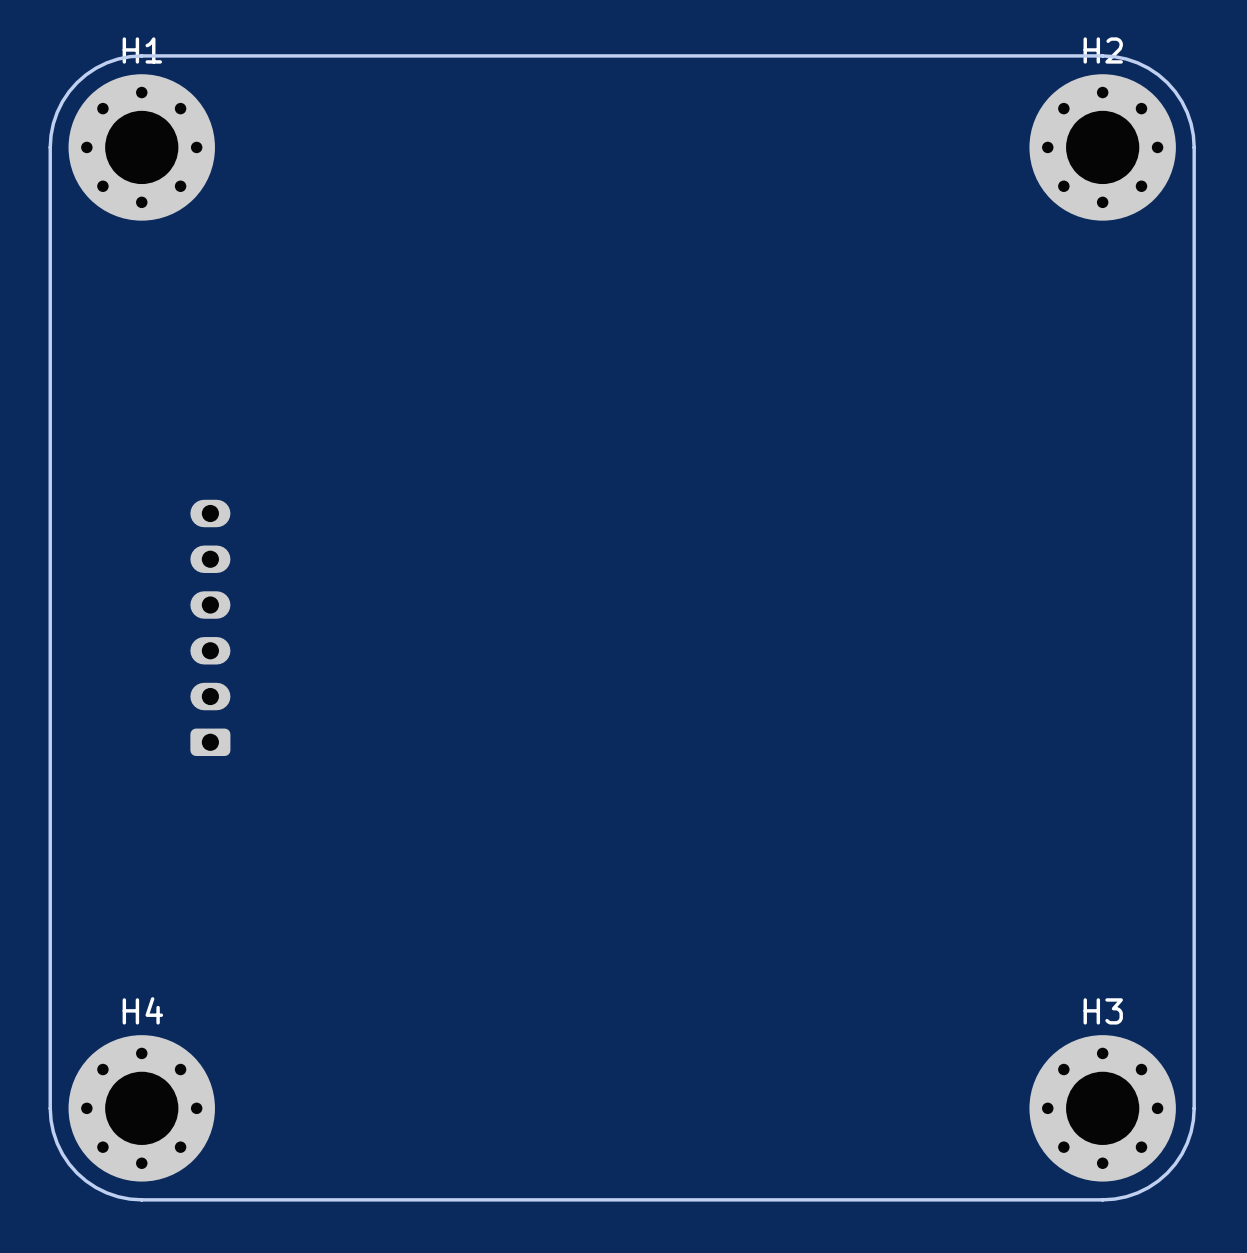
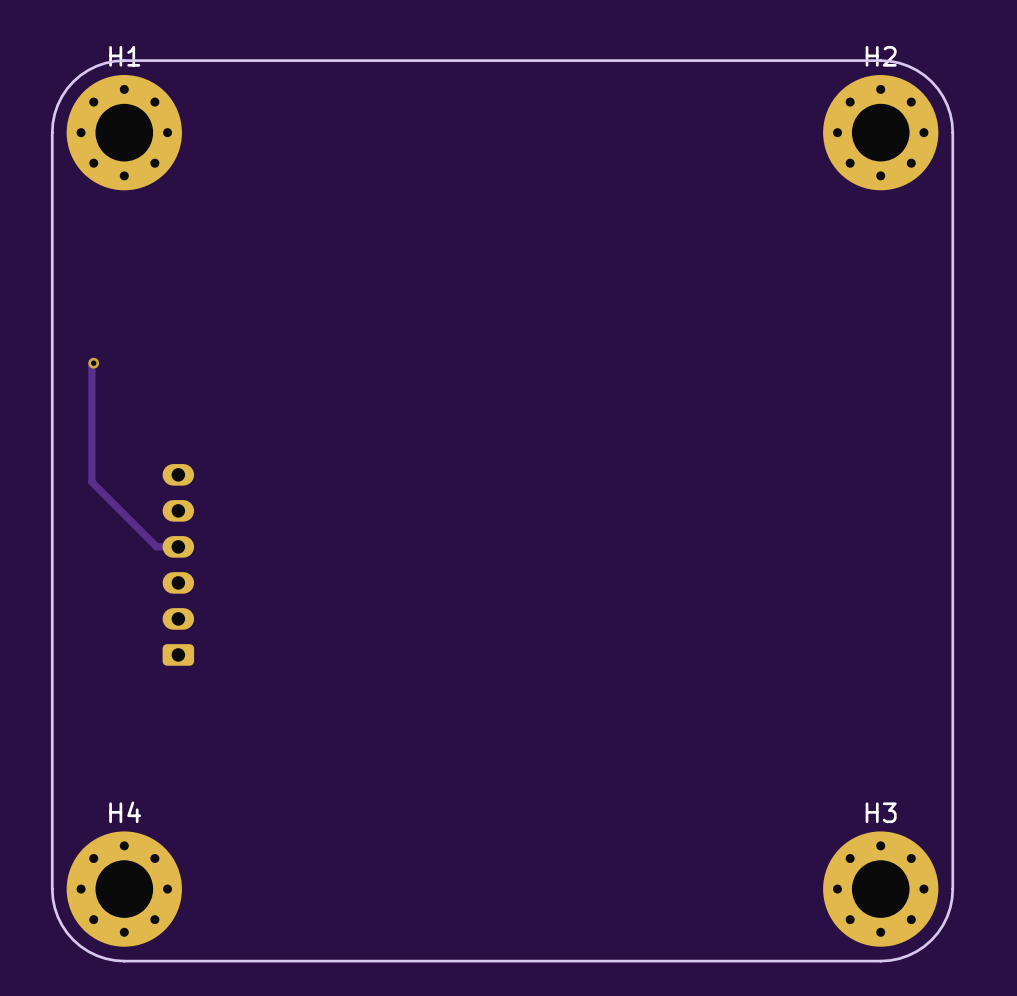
track: none -> (93, 363) (91, 364) (91, 482) (156, 546) (178, 546)
via: none -> (93, 363)
part position: (210, 627) -> (178, 564)

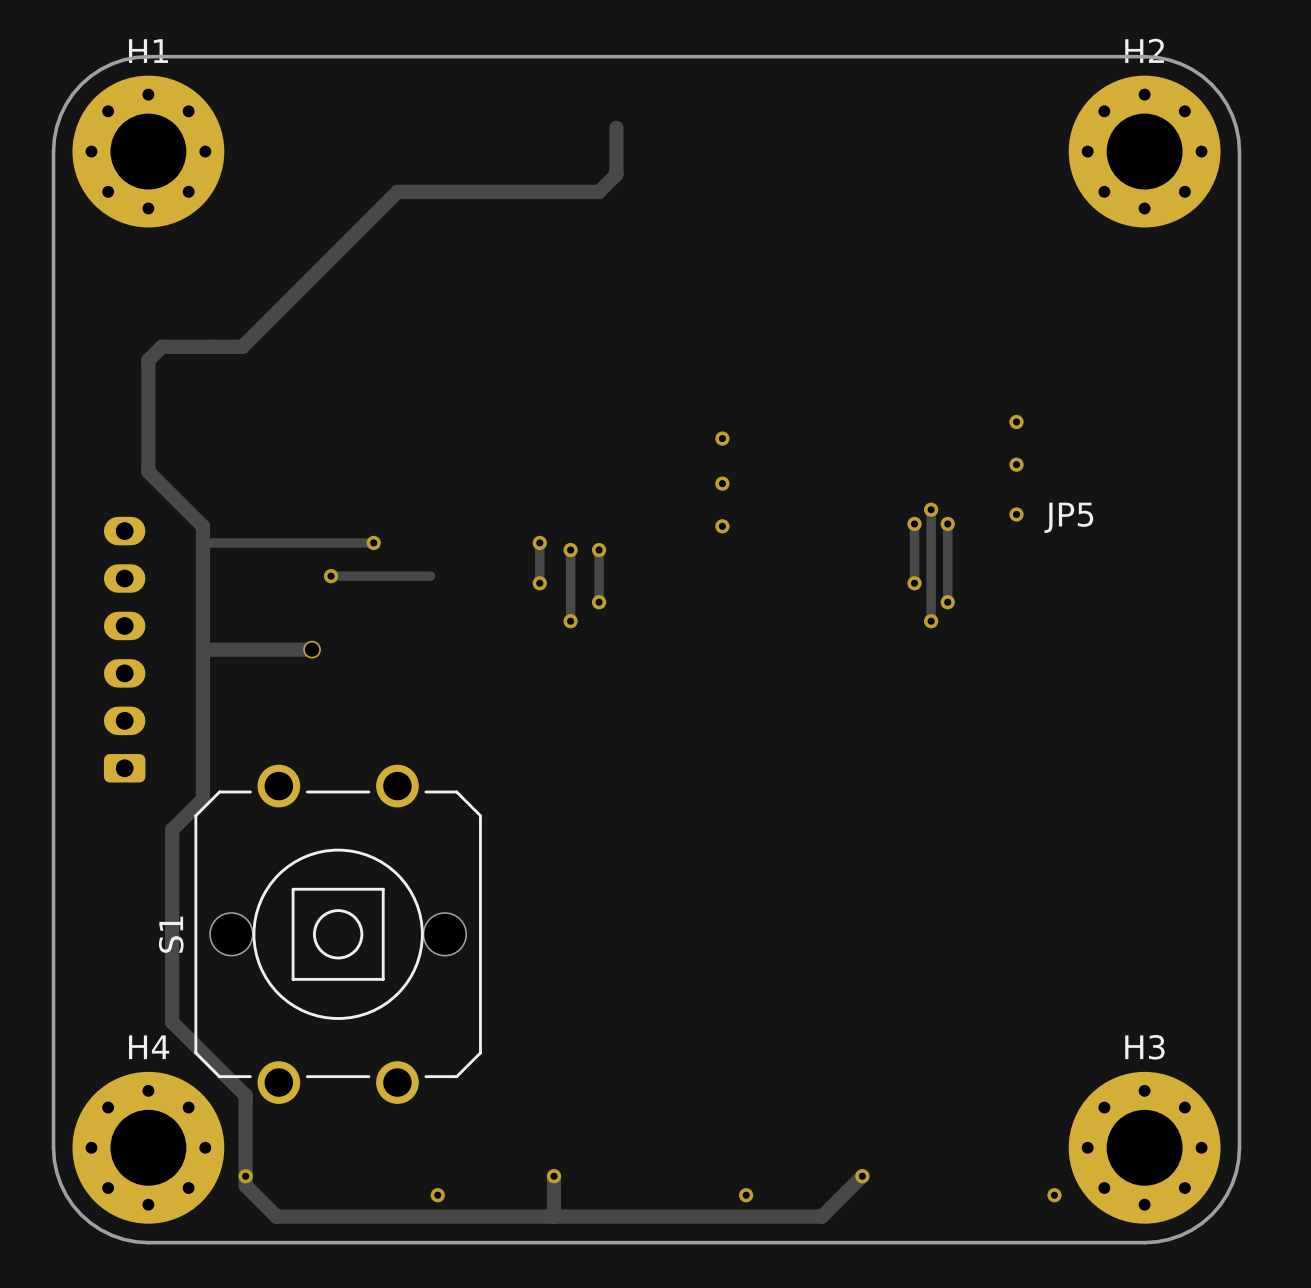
track: none -> (616, 127) (616, 174) (599, 191) (397, 191) (242, 346) (161, 346) (148, 360) (148, 471) (202, 526) (202, 799) (172, 829) (172, 1022) (245, 1095) (245, 1185) (276, 1216) (822, 1216) (862, 1176)
via: none -> (1016, 421)
via: none -> (722, 438)
track: (93, 363) (91, 364) (91, 482) (156, 546) (178, 546) -> none
via: (93, 363) -> none
via: none -> (1016, 464)
via: none -> (722, 483)
track: none -> (931, 509) (931, 621)
via: none -> (931, 509)
via: none -> (1016, 514)
JP5: none -> (1068, 517)
track: none -> (914, 523) (914, 583)
via: none -> (914, 523)
track: none -> (947, 523) (947, 602)
via: none -> (947, 523)
via: none -> (722, 526)
track: none -> (202, 540) (205, 542) (373, 542)
via: none -> (373, 542)
track: none -> (539, 542) (539, 583)
via: none -> (539, 542)
track: none -> (570, 550) (570, 621)
via: none -> (570, 550)
track: none -> (599, 550) (599, 602)
via: none -> (599, 550)
track: none -> (331, 576) (430, 576)
via: none -> (331, 576)
via: none -> (539, 583)
via: none -> (914, 583)
via: none -> (599, 602)
via: none -> (947, 602)
via: none -> (570, 621)
via: none -> (931, 621)
track: none -> (202, 649) (312, 649)
via: none -> (312, 649)
part position: (178, 564) -> (124, 649)
S1: none -> (338, 934)
via: none -> (245, 1176)
track: none -> (554, 1176) (554, 1216)
via: none -> (554, 1176)
via: none -> (862, 1176)
via: none -> (437, 1195)
via: none -> (746, 1195)
via: none -> (1054, 1195)

